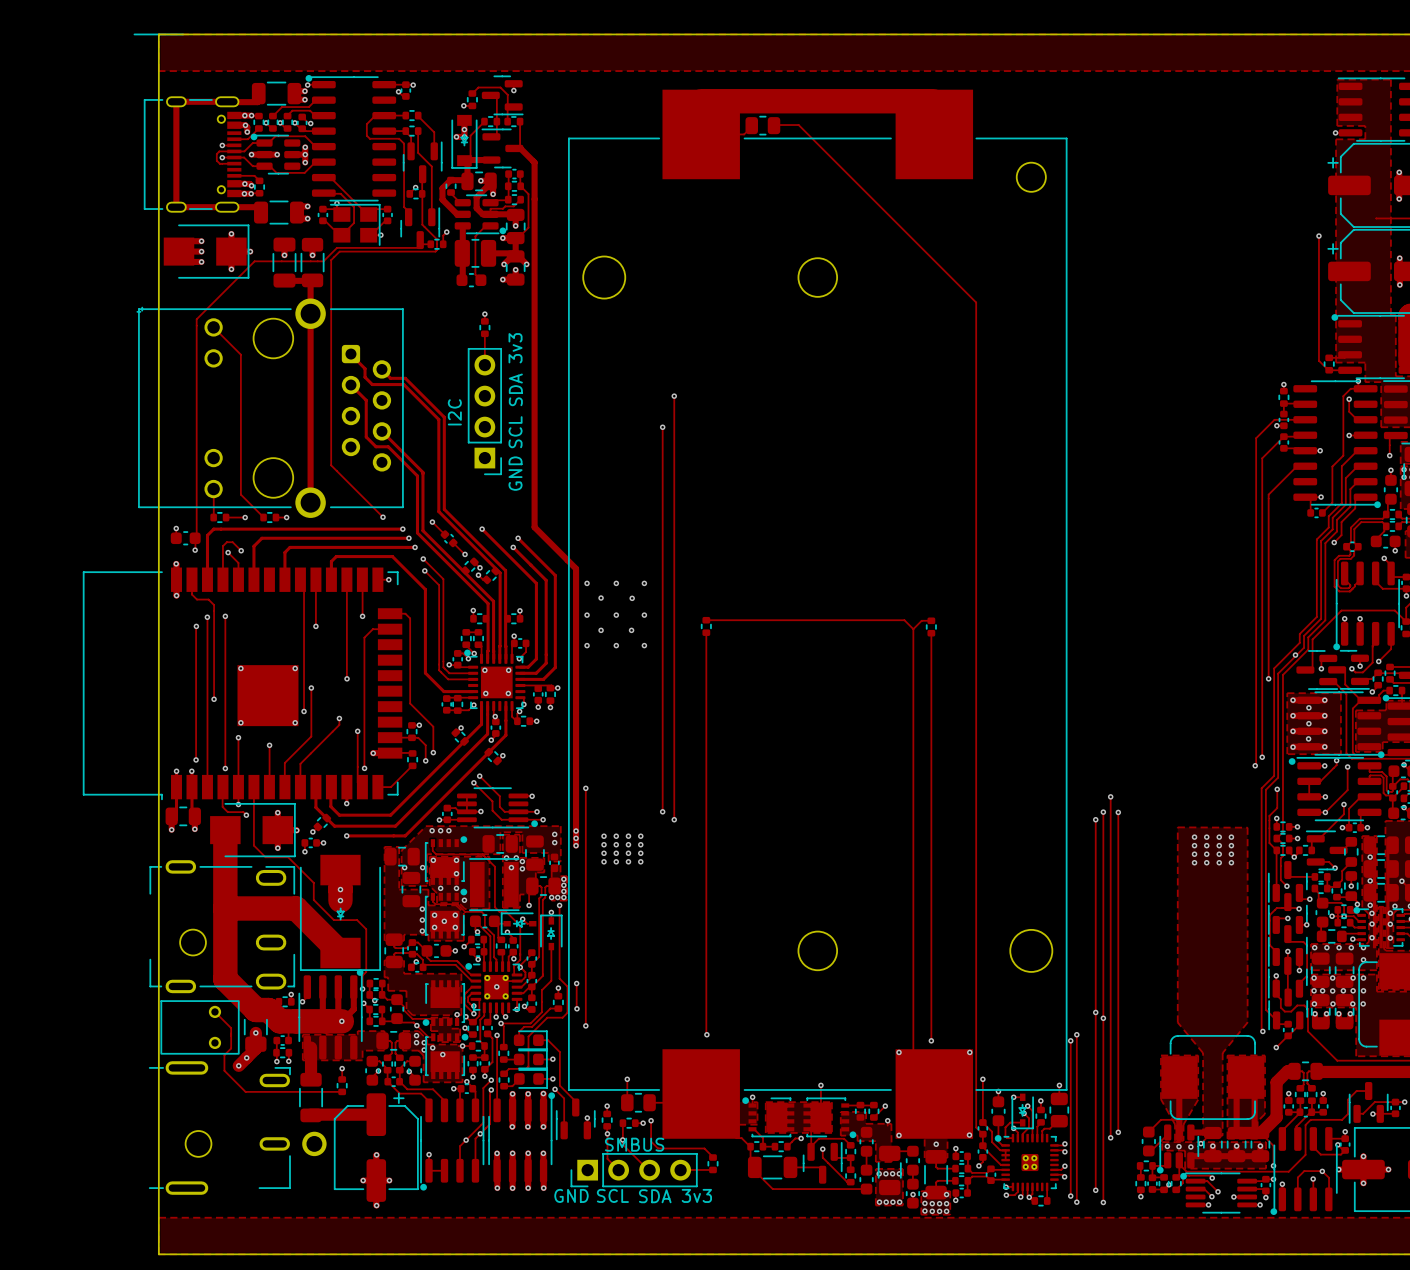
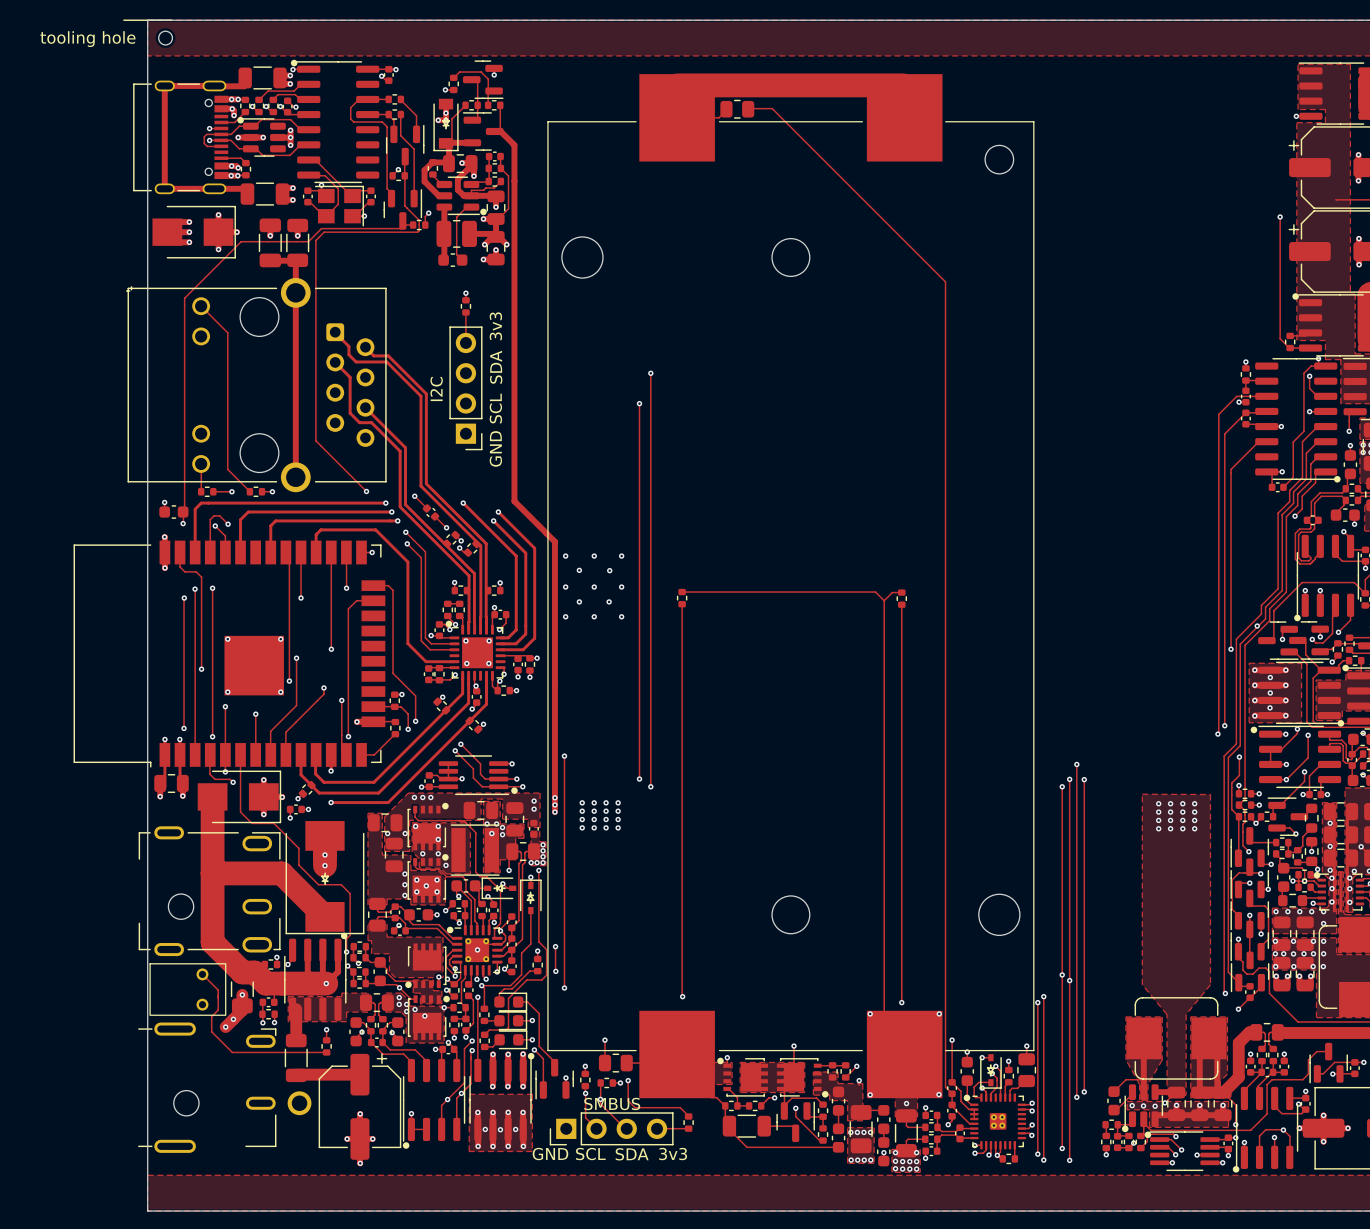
part: none -> (165, 38)
zone outline: none -> (469, 1094) (469, 1151) (532, 1151) (532, 1094) (469, 1094)
via: none -> (485, 1129)
via: none -> (515, 1129)
via: none -> (500, 1129)

